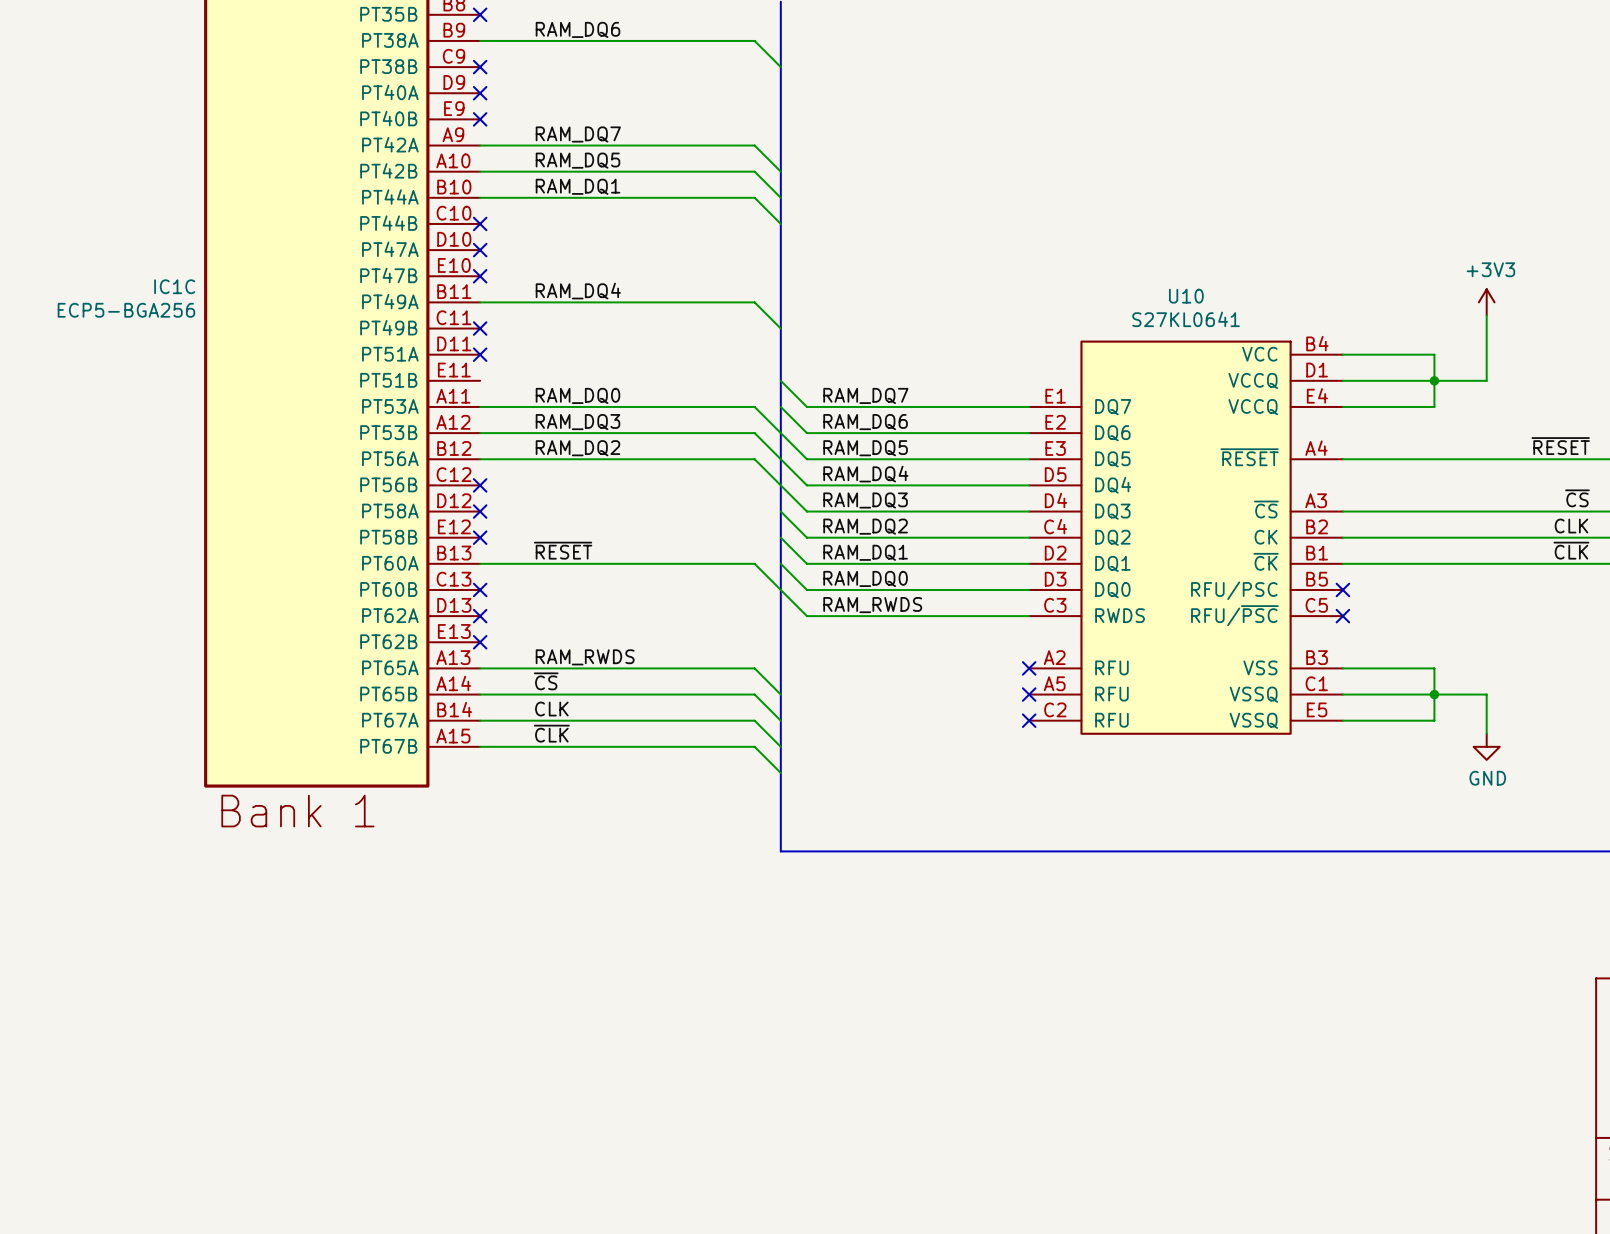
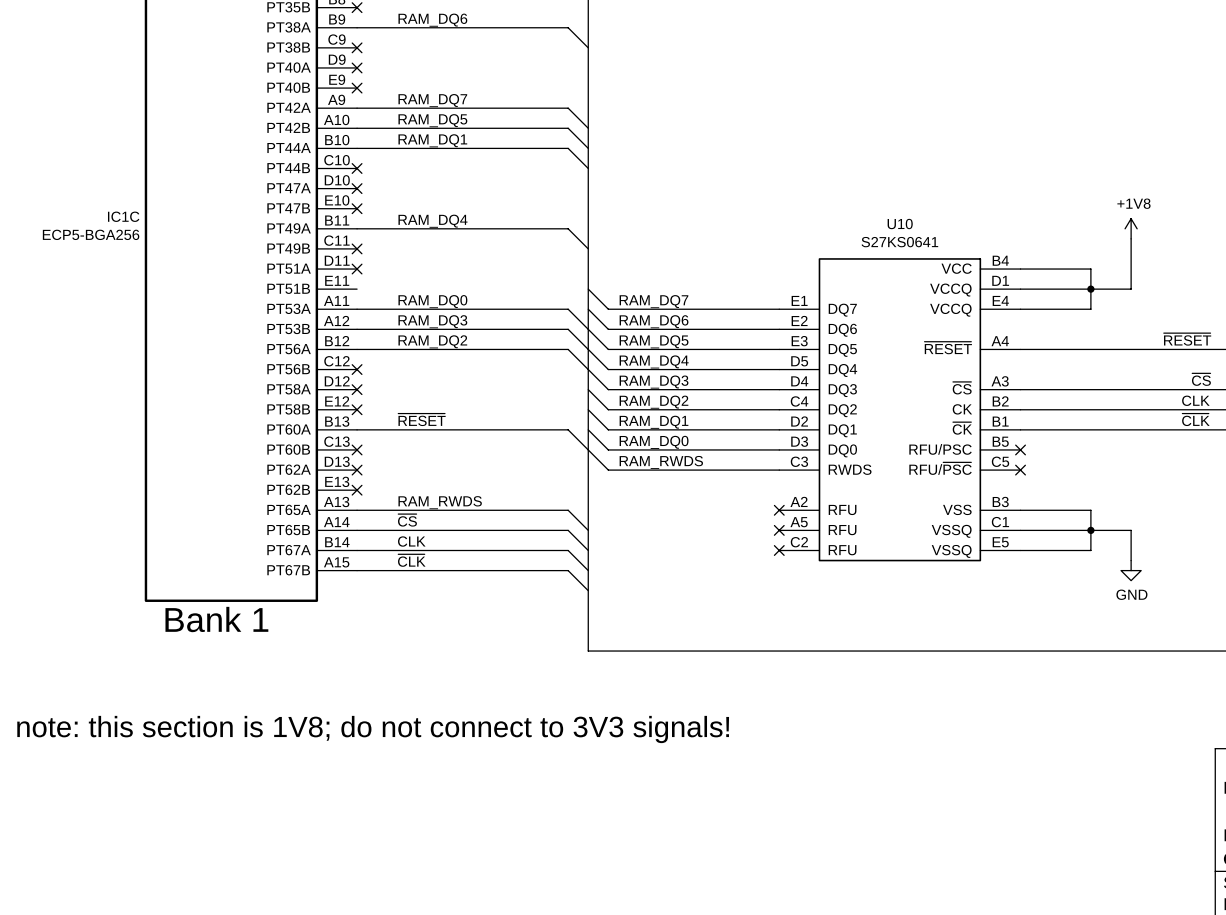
power symbol: +3V3 (1486, 302) -> +1V8 (1131, 228)
U10 value: S27KL0641 (1186, 319) -> S27KS0641 (899, 242)
text: none -> note: this section is 1V8; do not connect to 3V3 signals! (373, 729)

